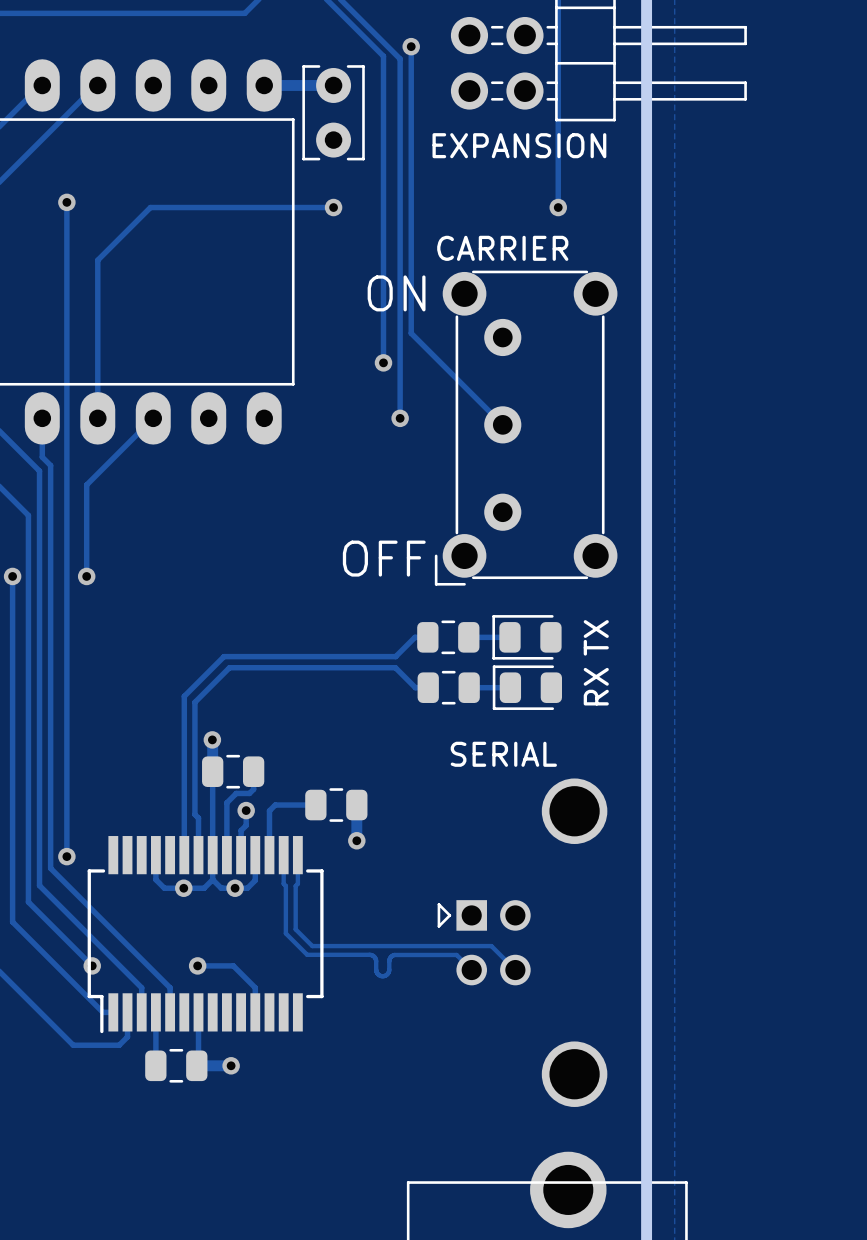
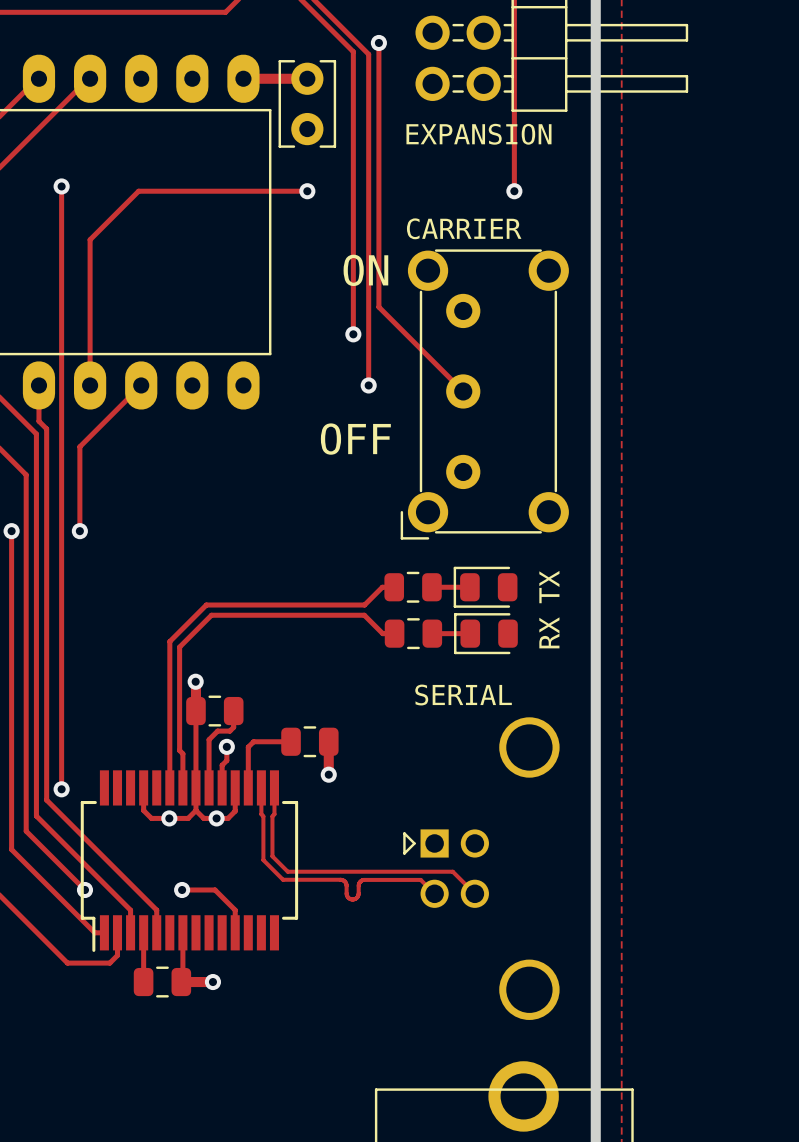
text position: OFF (384, 558) -> OFF (355, 439)

